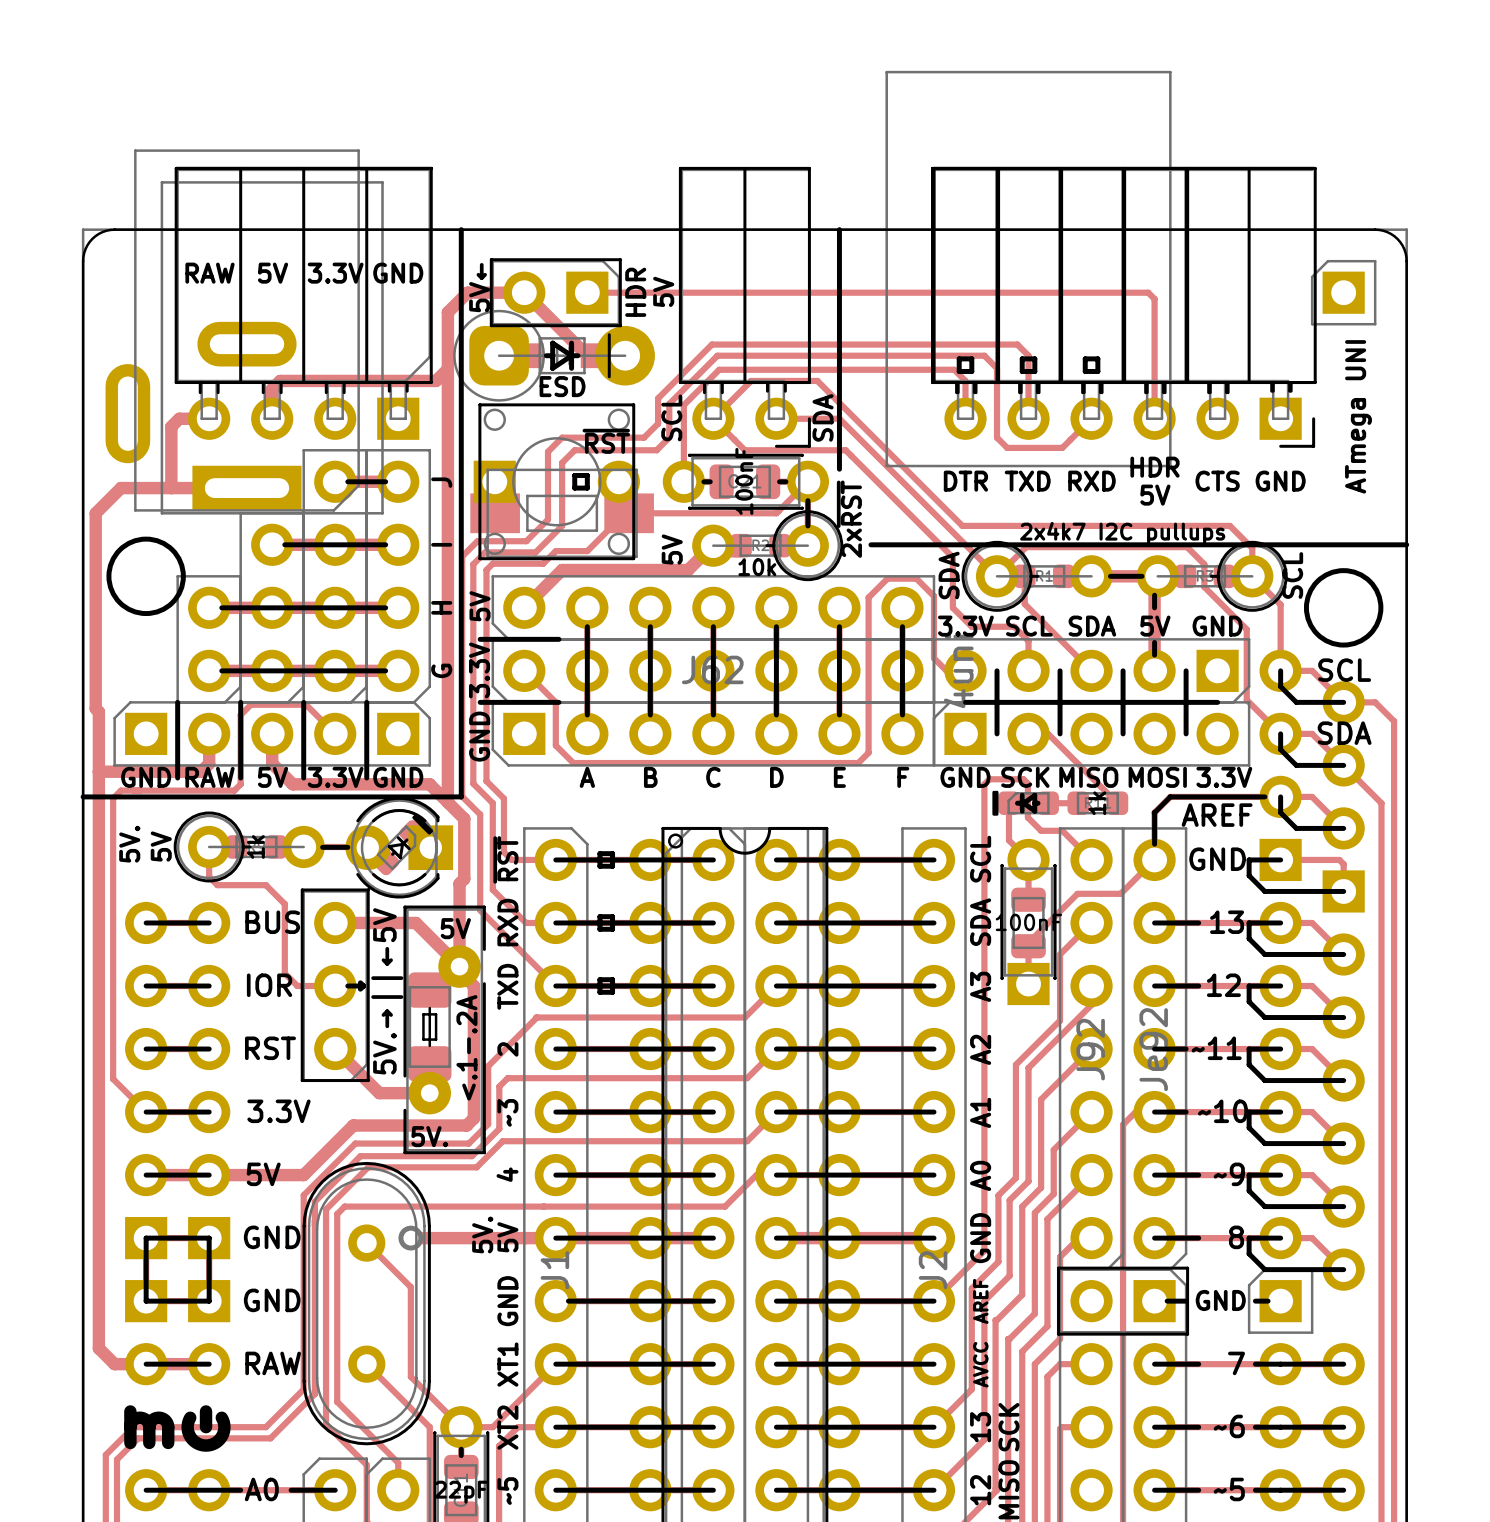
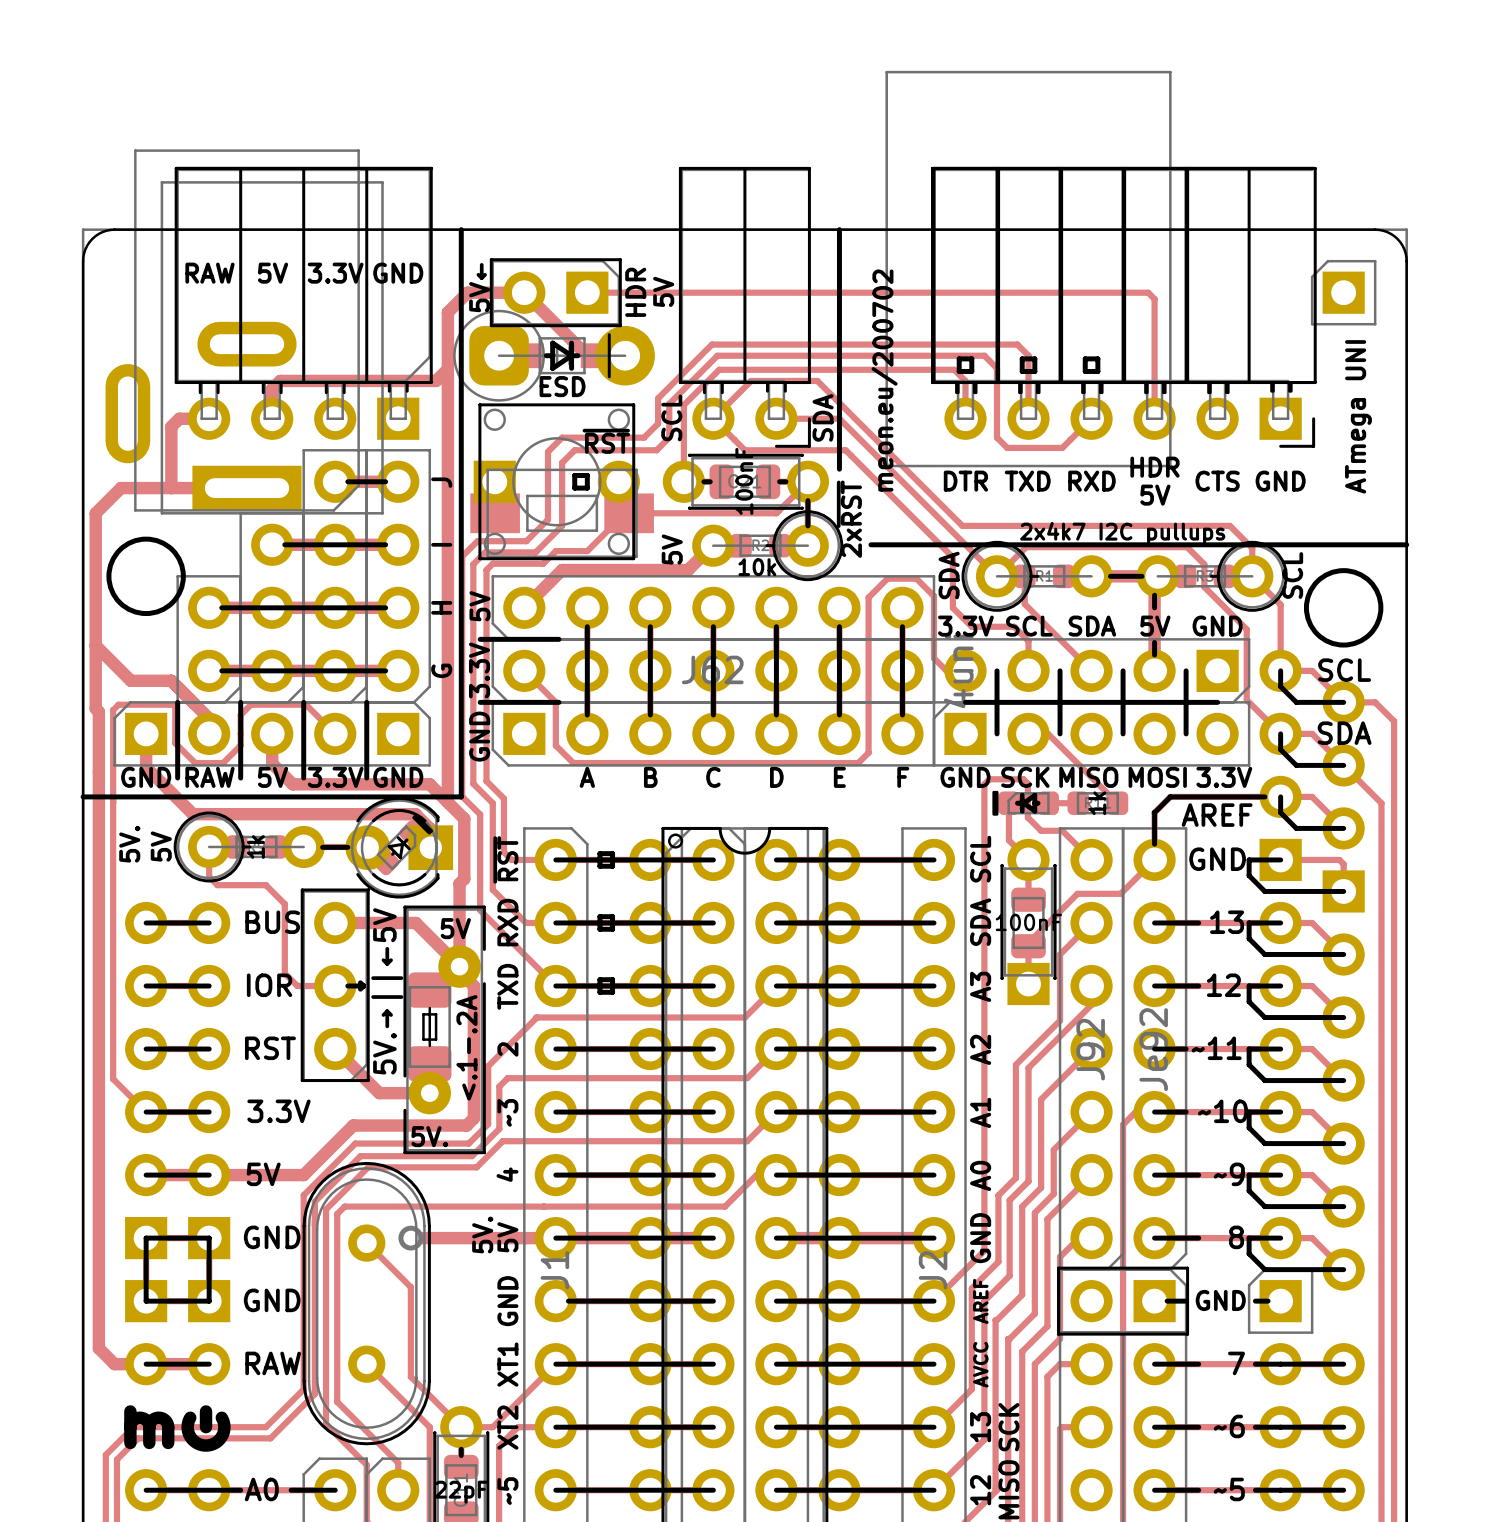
text: none -> meon.eu/200702 (884, 380)
track: none -> (146, 733) (146, 767) (192, 814) (415, 814) (429, 828) (429, 847)
track: (209, 733) (209, 763) (201, 771) (98, 771) -> (209, 733) (209, 718) (171, 680) (130, 680) (95, 645)
track: (240, 745) (240, 784) (234, 790) (120, 790) (113, 798) -> (240, 745) (223, 763) (195, 763) (175, 743) (175, 706) (173, 704) (118, 704) (113, 710) (113, 798)

